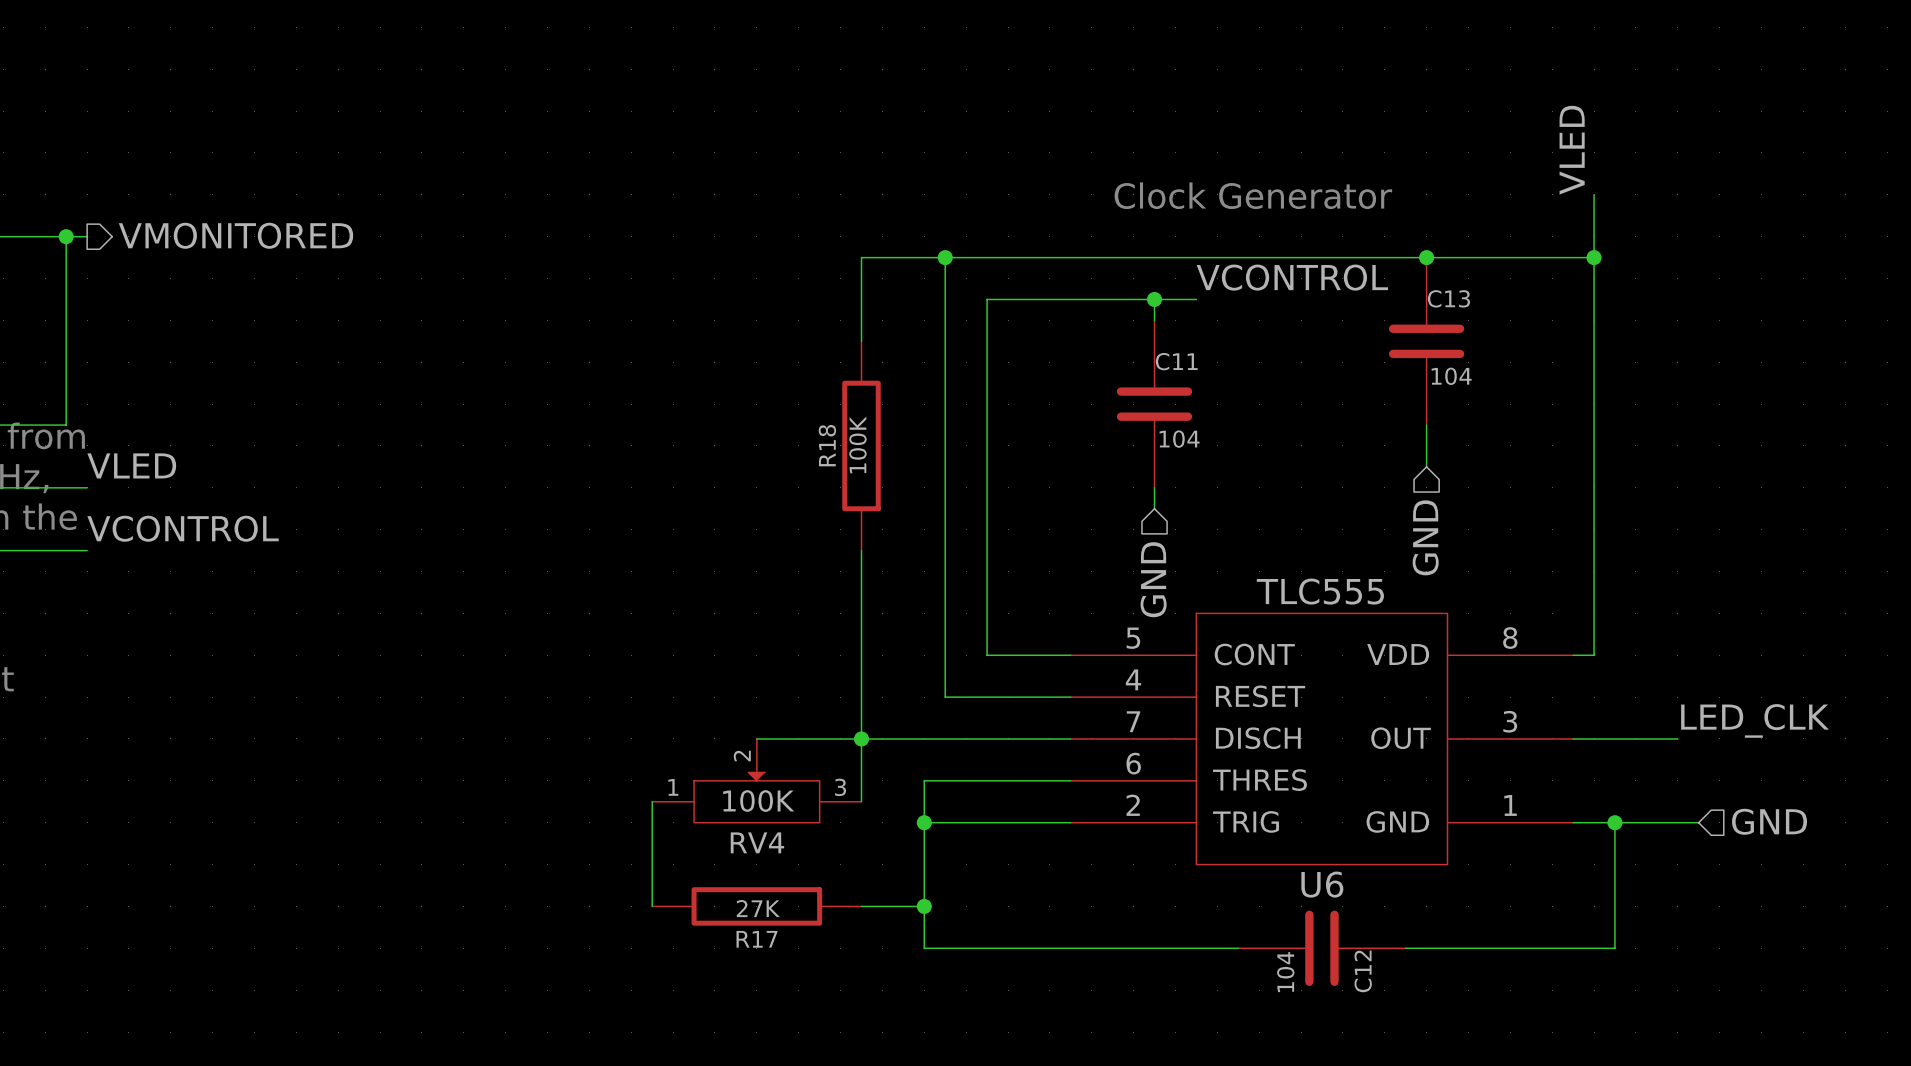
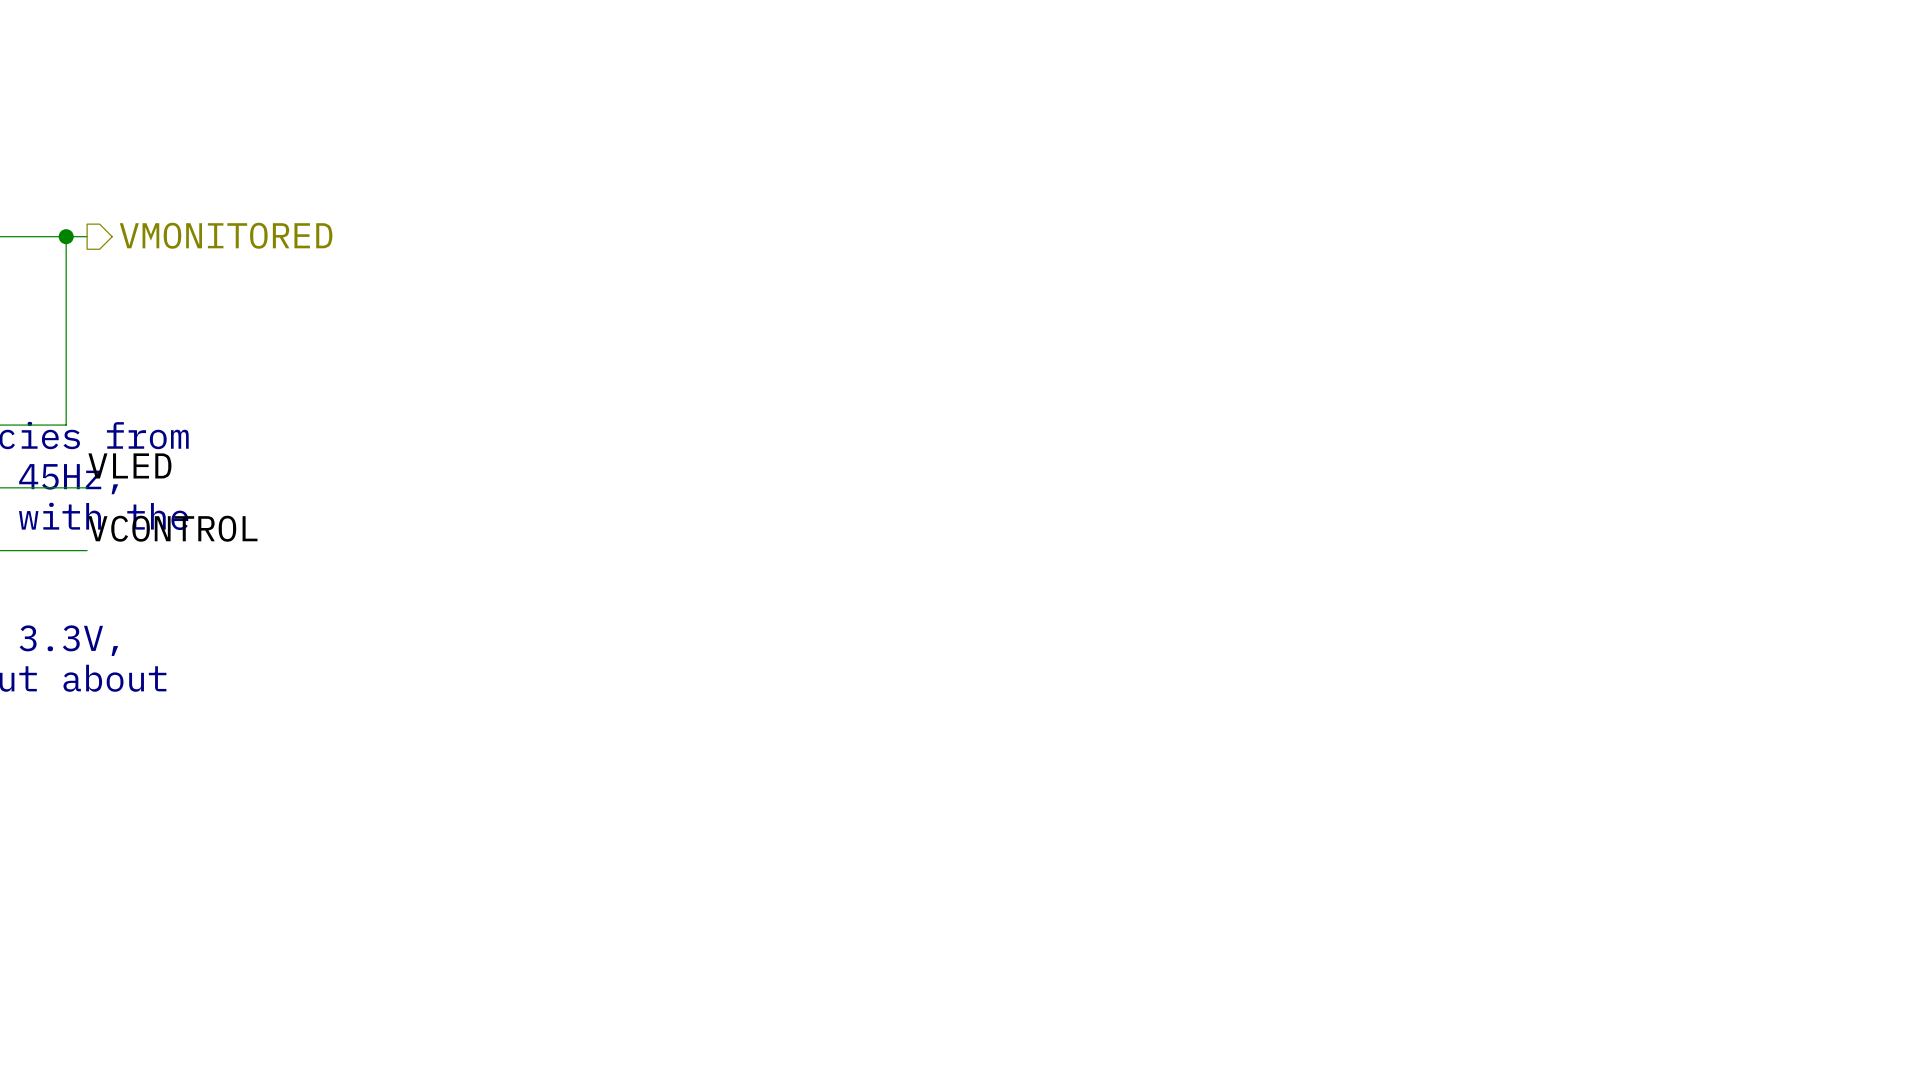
label: VLED (1572, 150) -> none
wire: (1594, 194) (1594, 655) (1573, 655) -> none
text: Clock Generator (1253, 195) -> none
wire: (945, 257) (945, 697) (1070, 697) -> none
junction: (945, 257) -> none
junction: (1426, 257) -> none
wire: (1594, 257) (861, 257) (861, 341) -> none
junction: (1594, 257) -> none
label: VCONTROL (1292, 277) -> none
wire: (1154, 299) (1154, 320) -> none
junction: (1154, 299) -> none
wire: (1196, 299) (987, 299) (987, 655) (1070, 655) -> none
C13: 104 (1426, 341) -> none
C11: 104 (1154, 404) -> none
wire: (1426, 425) (1426, 466) -> none
R18: 100K (861, 445) -> none
wire: (1154, 487) (1154, 508) -> none
hierarchical label: GND (1425, 537) -> none
wire: (861, 550) (861, 801) -> none
hierarchical label: GND (1153, 579) -> none
label: LED_CLK (1755, 720) -> none
wire: (756, 738) (1070, 738) -> none
junction: (861, 738) -> none
U6: TLC555 (1321, 738) -> none
wire: (1573, 738) (1677, 738) -> none
RV4: 100K (756, 780) -> none
wire: (1070, 780) (924, 780) (924, 948) (1238, 948) -> none
wire: (652, 801) (652, 906) -> none
hierarchical label: GND (1769, 821) -> none
wire: (924, 822) (1070, 822) -> none
junction: (924, 822) -> none
wire: (1573, 822) (1698, 822) -> none
wire: (1614, 822) (1614, 948) (1405, 948) -> none
junction: (1614, 822) -> none
R17: 27K (756, 906) -> none
wire: (861, 906) (924, 906) -> none
junction: (924, 906) -> none
C12: 104 (1321, 948) -> none

